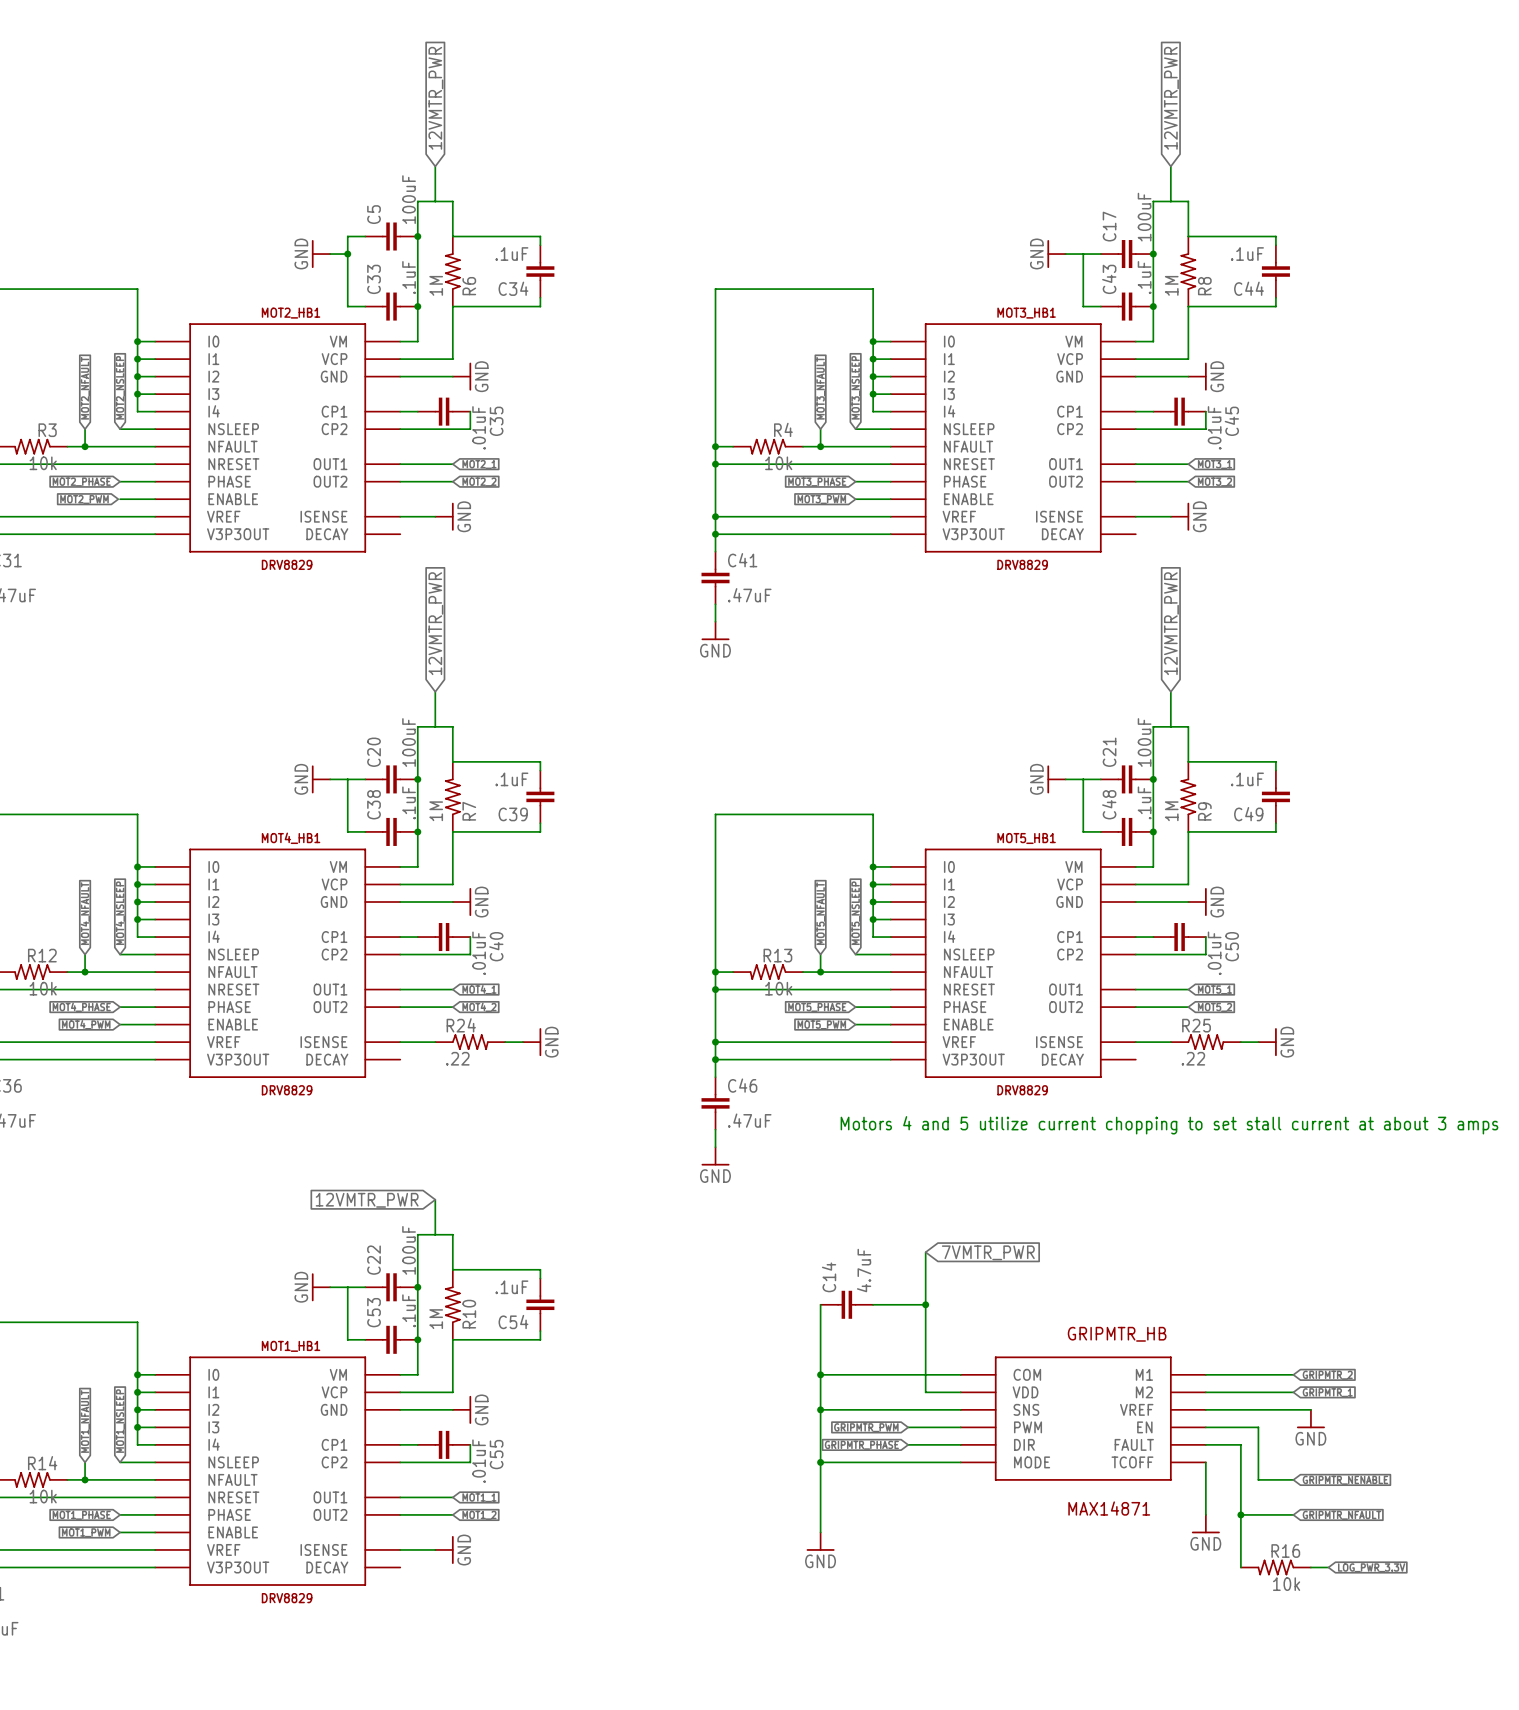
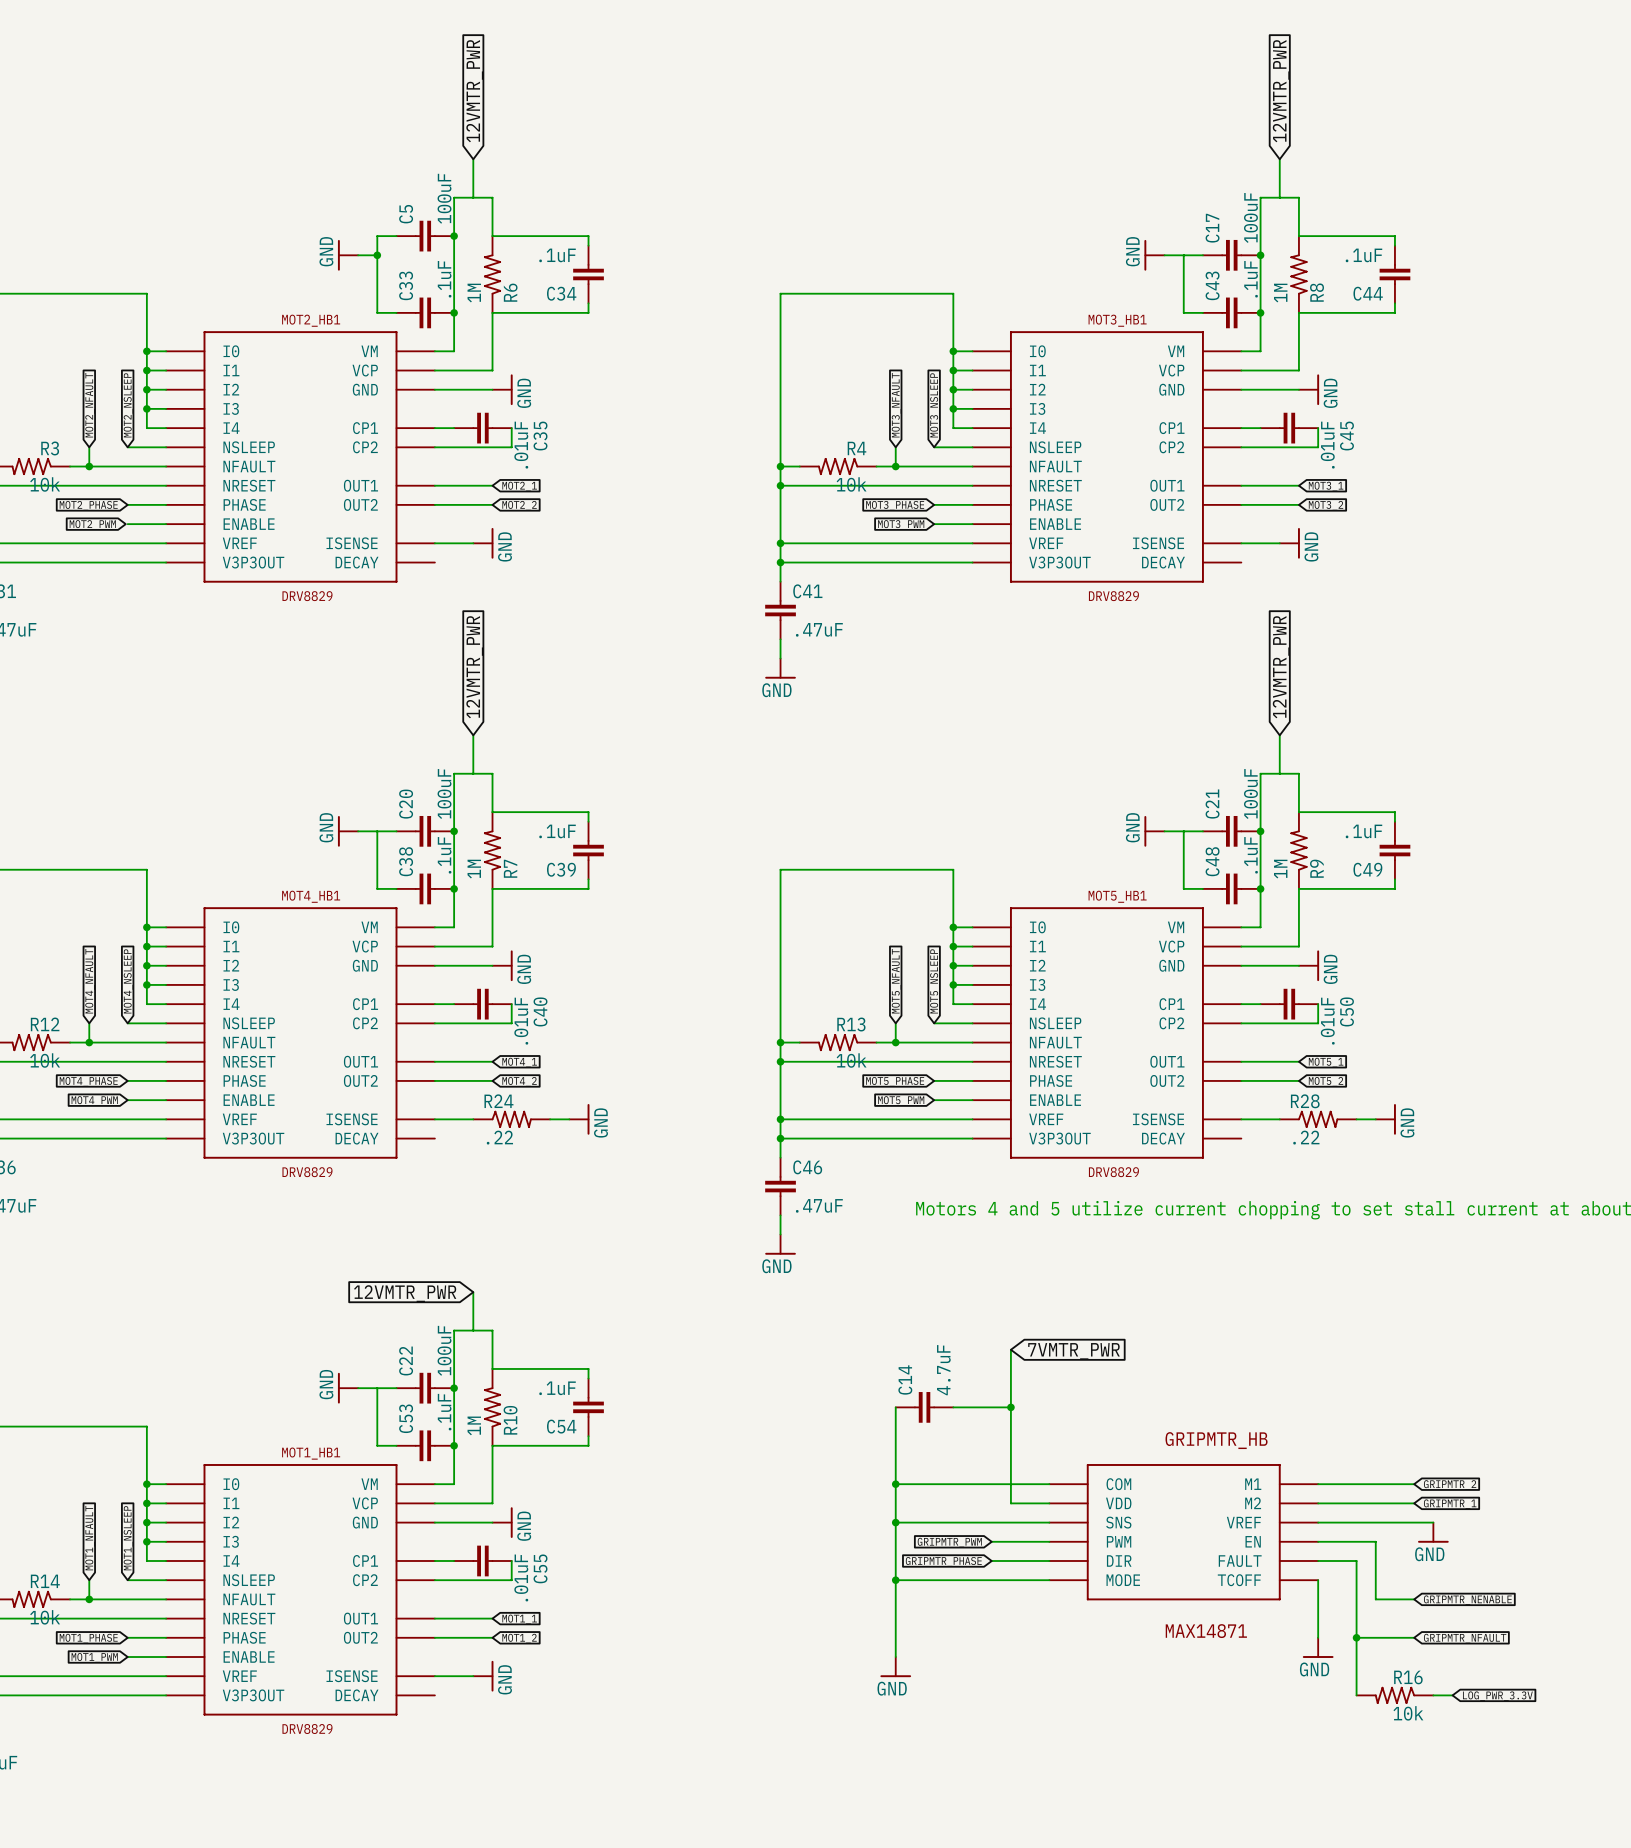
R25 name: R25 (1196, 1025) -> R28 (1305, 1101)

